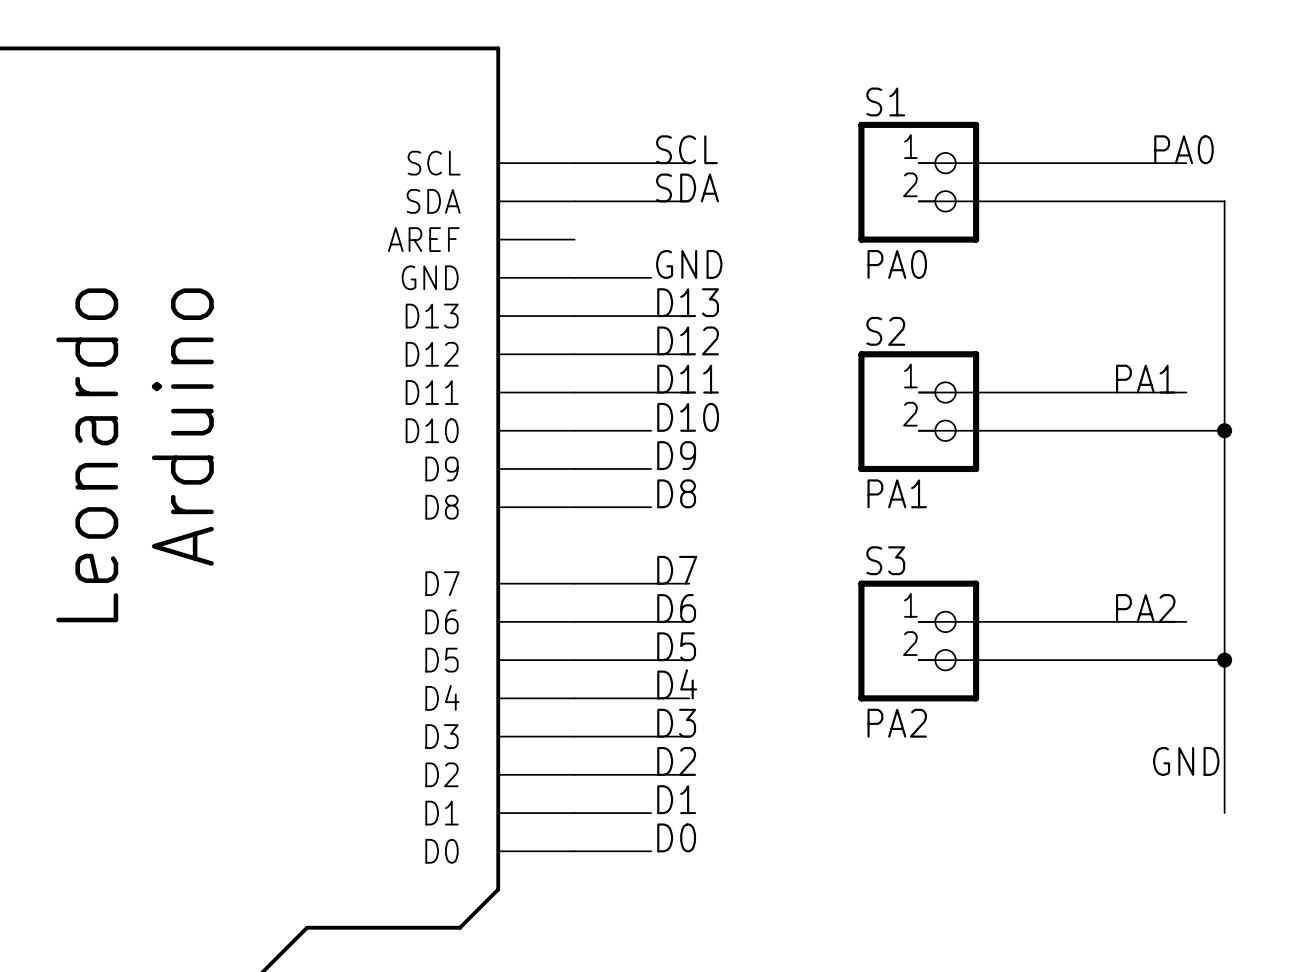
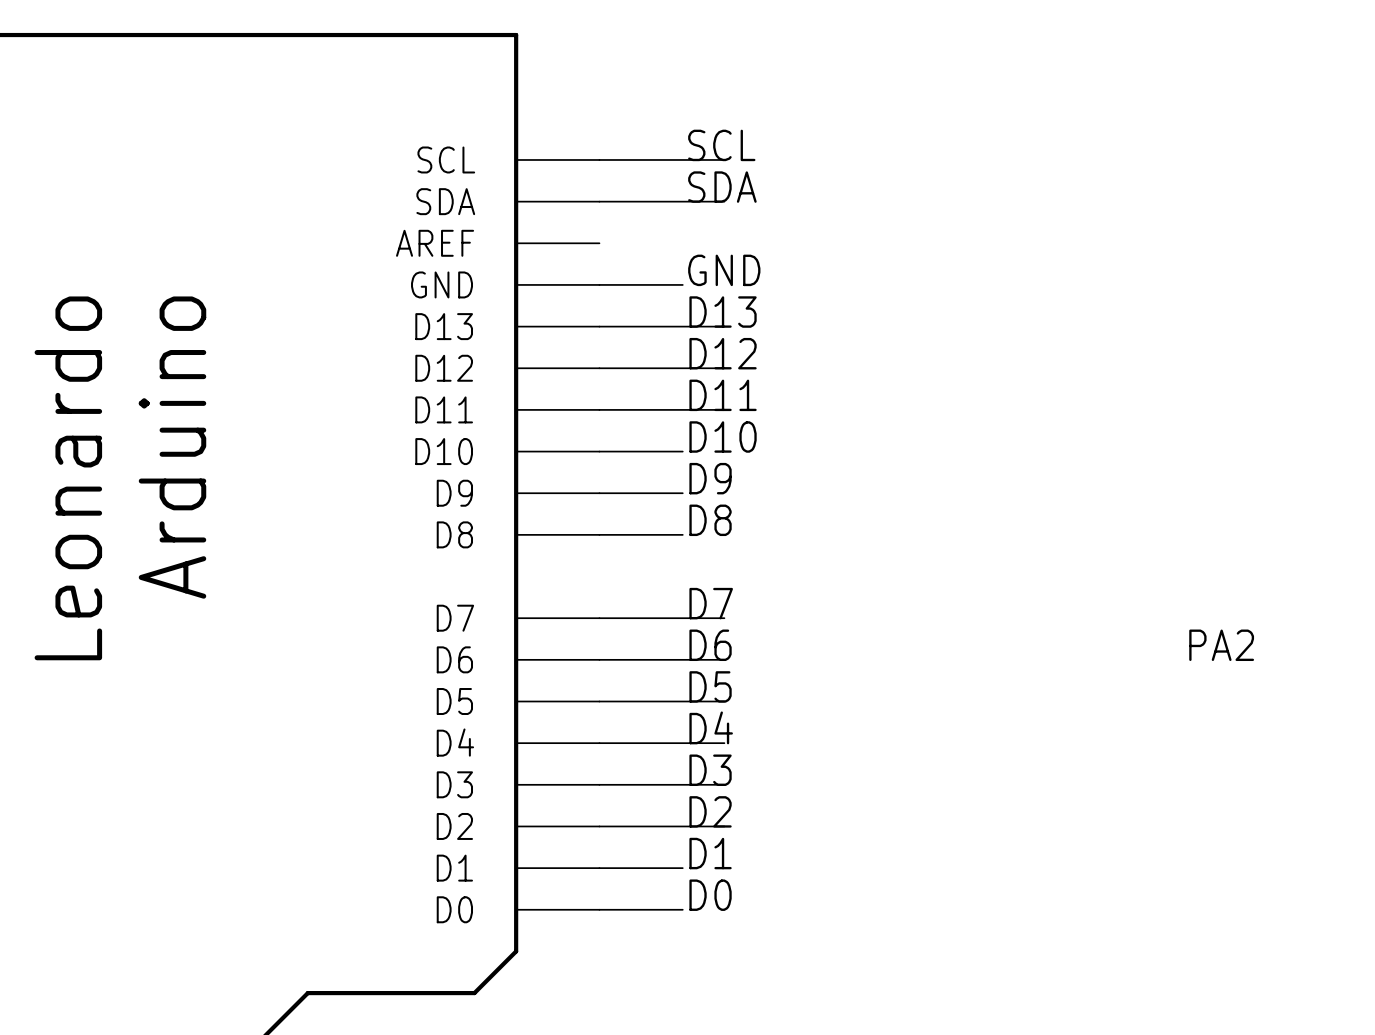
label: PA0 (1183, 149) -> none
wire: (918, 163) (1186, 163) -> none
S1: PA0 (918, 182) -> none
wire: (918, 201) (1224, 201) (1224, 813) -> none
label: PA1 (1145, 379) -> none
wire: (918, 392) (1186, 392) -> none
S2: PA1 (918, 411) -> none
wire: (918, 430) (1224, 430) -> none
junction: (1224, 430) -> none
wire: (918, 621) (1186, 621) -> none
S3: PA2 (918, 641) -> none
wire: (918, 660) (1224, 660) -> none
junction: (1224, 660) -> none
label: GND (1186, 761) -> none

